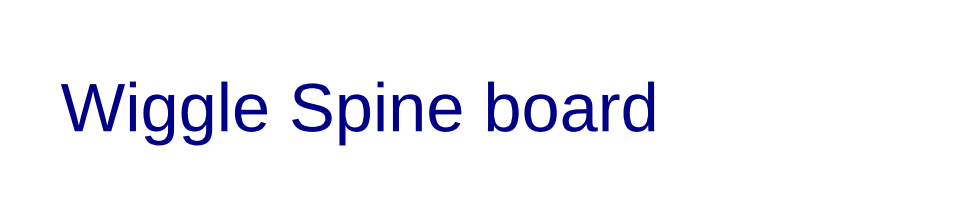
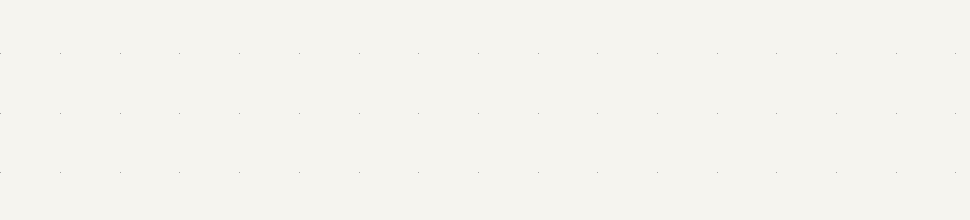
text: Wiggle Spine board (357, 113) -> none

